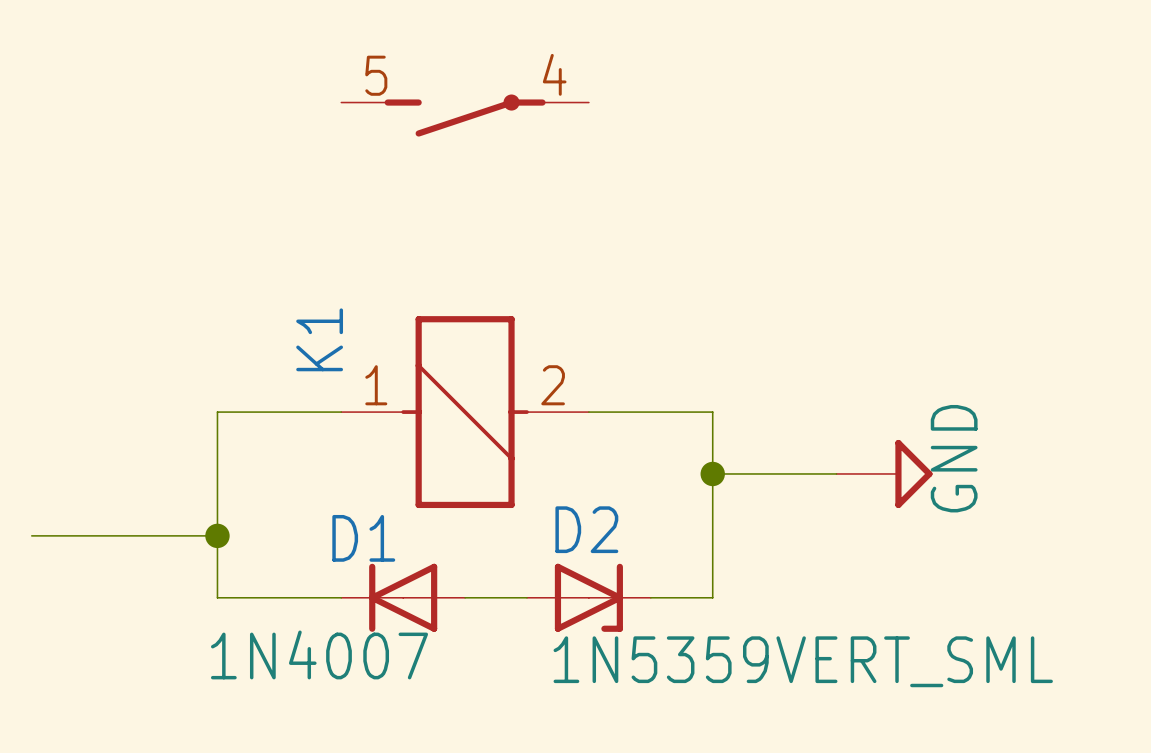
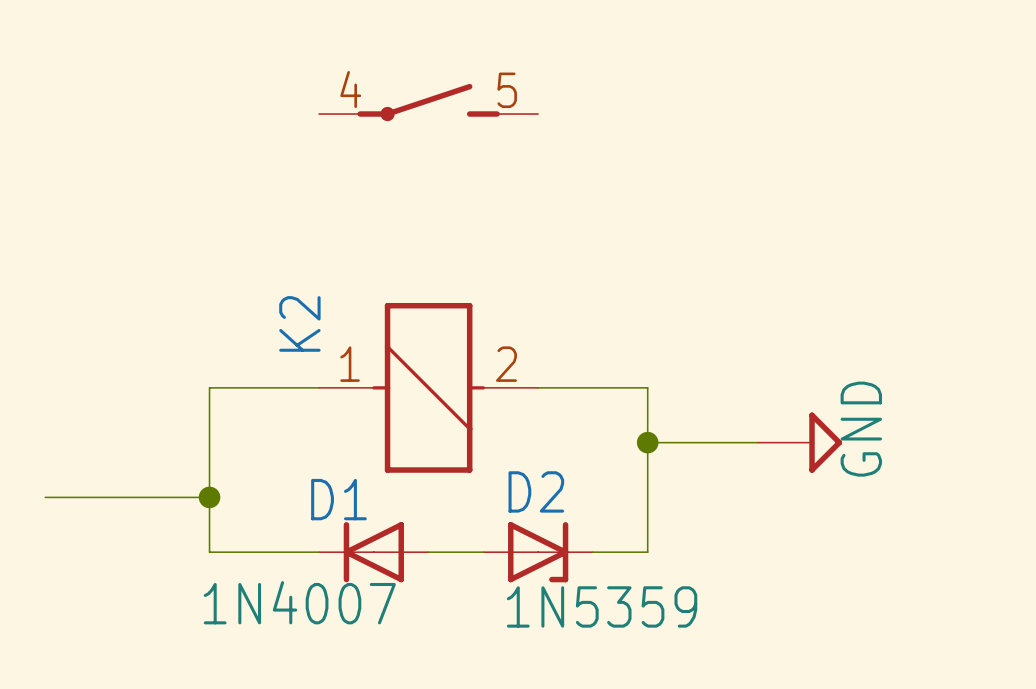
part rotation: 0° (465, 115) -> 180° (428, 102)
K1 name: K1 (319, 339) -> K2 (299, 323)
D2 value: 1N5359VERT_SML (803, 661) -> 1N5359 (602, 606)

